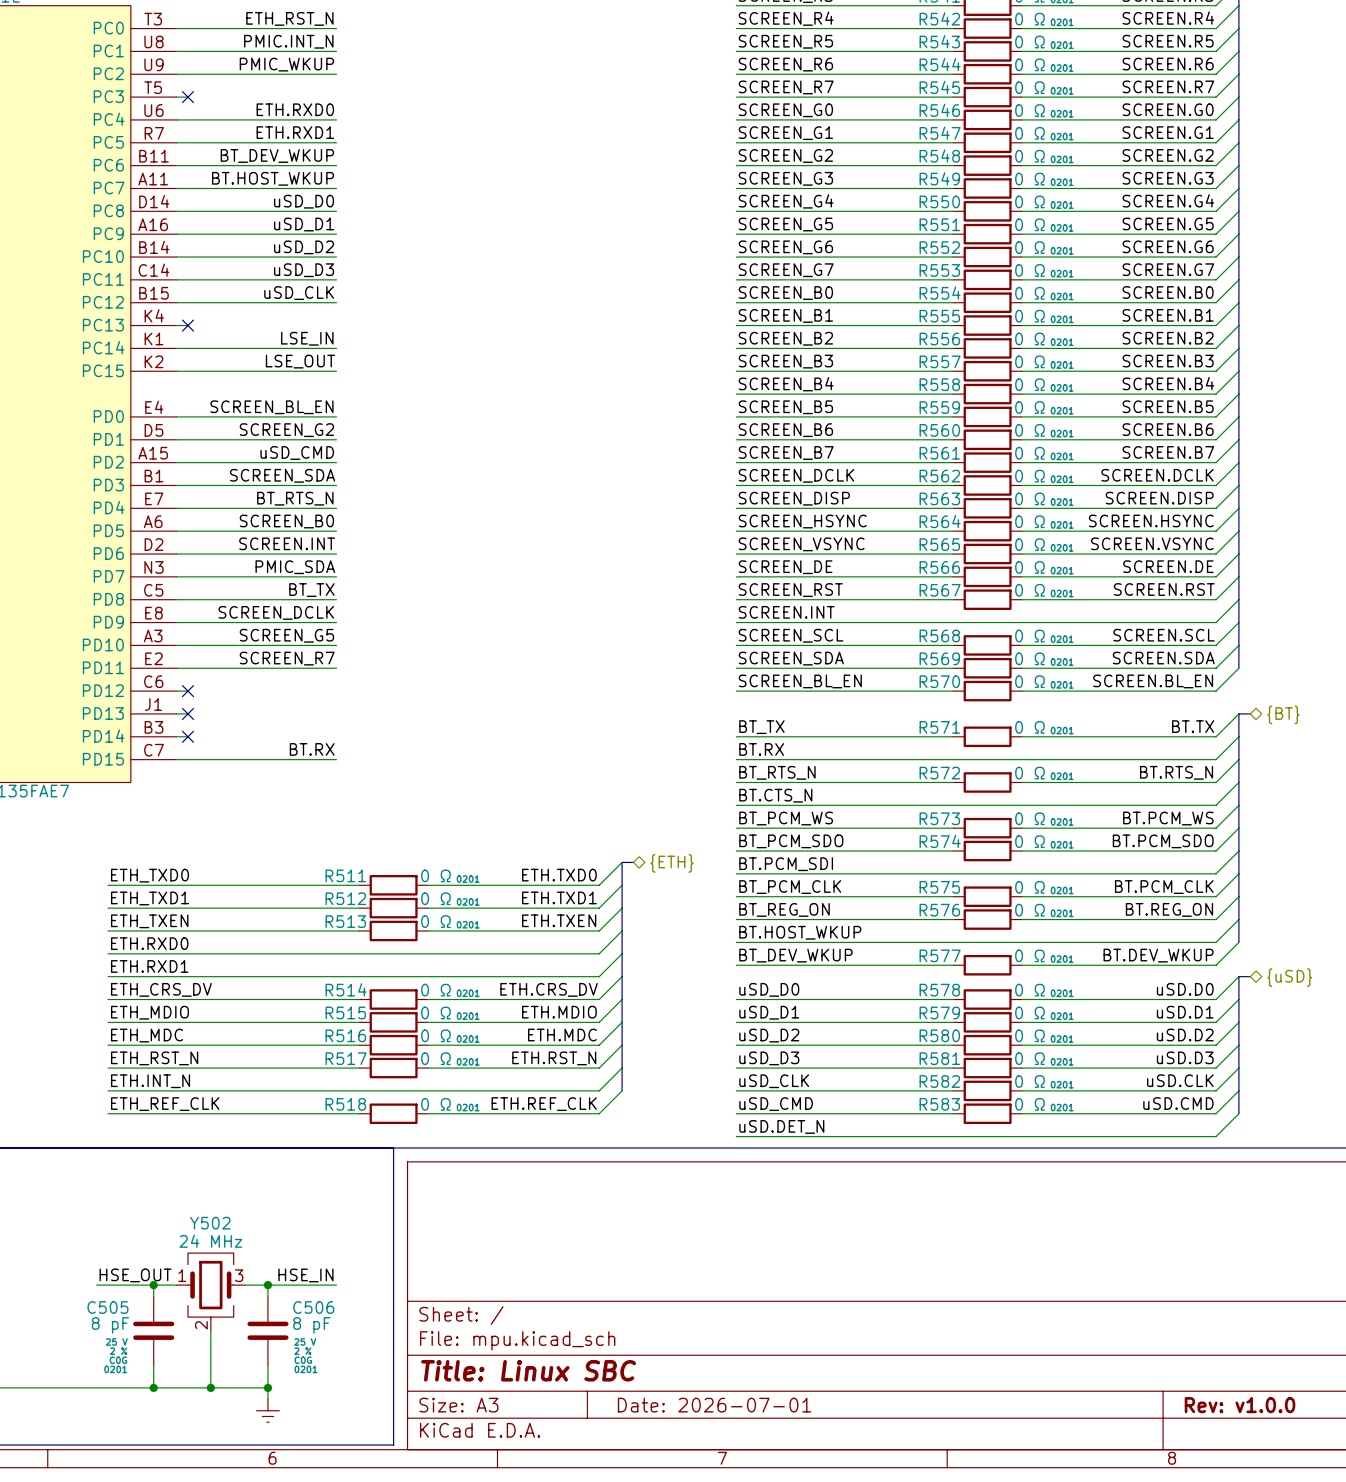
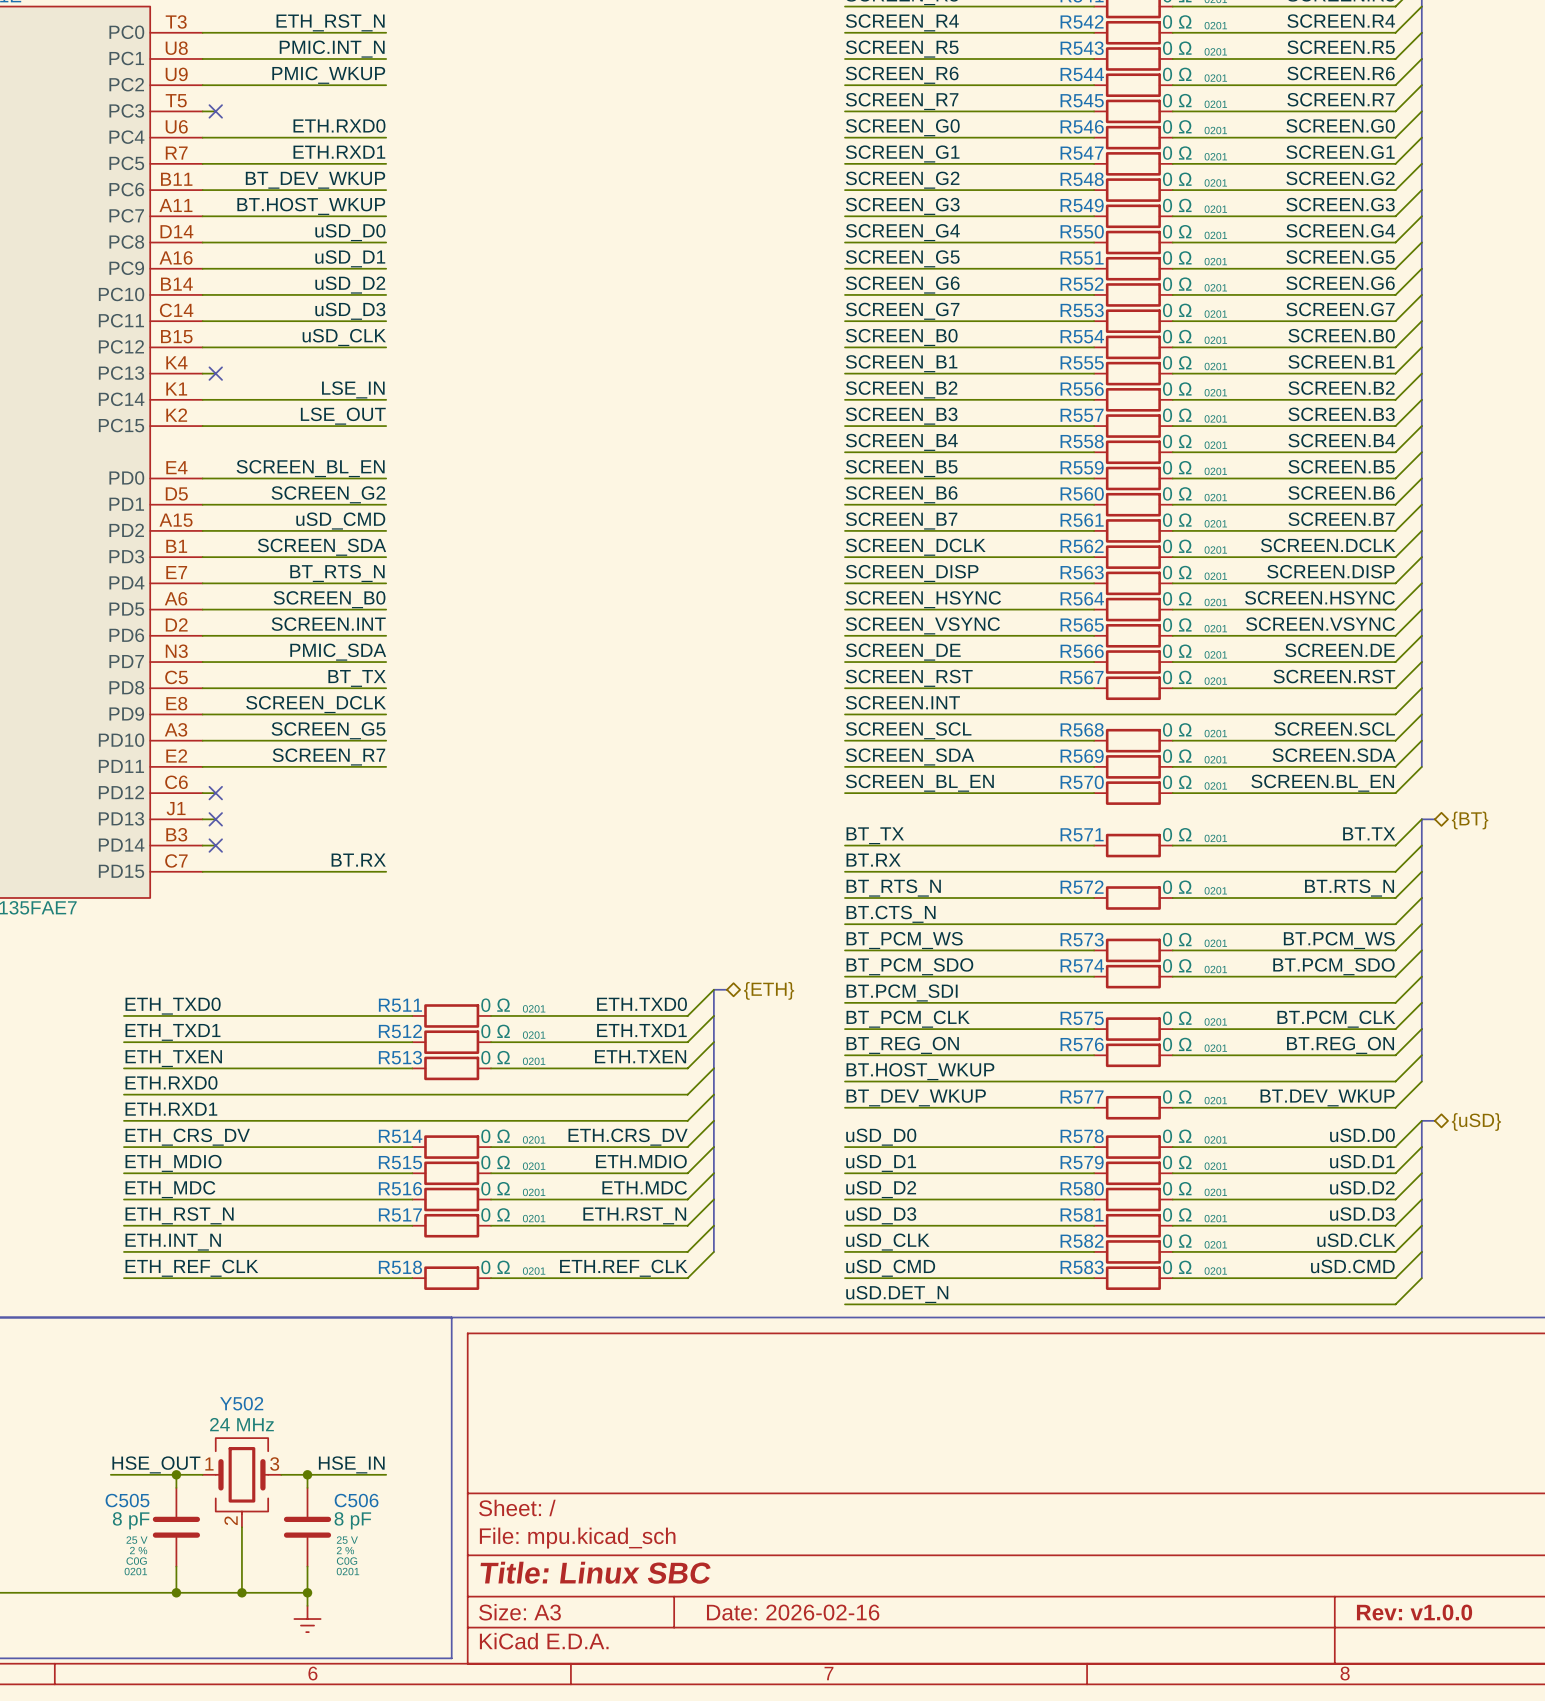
title block: Date: 2026-07-01 (714, 1405) -> Date: 2026-02-16 (793, 1612)

